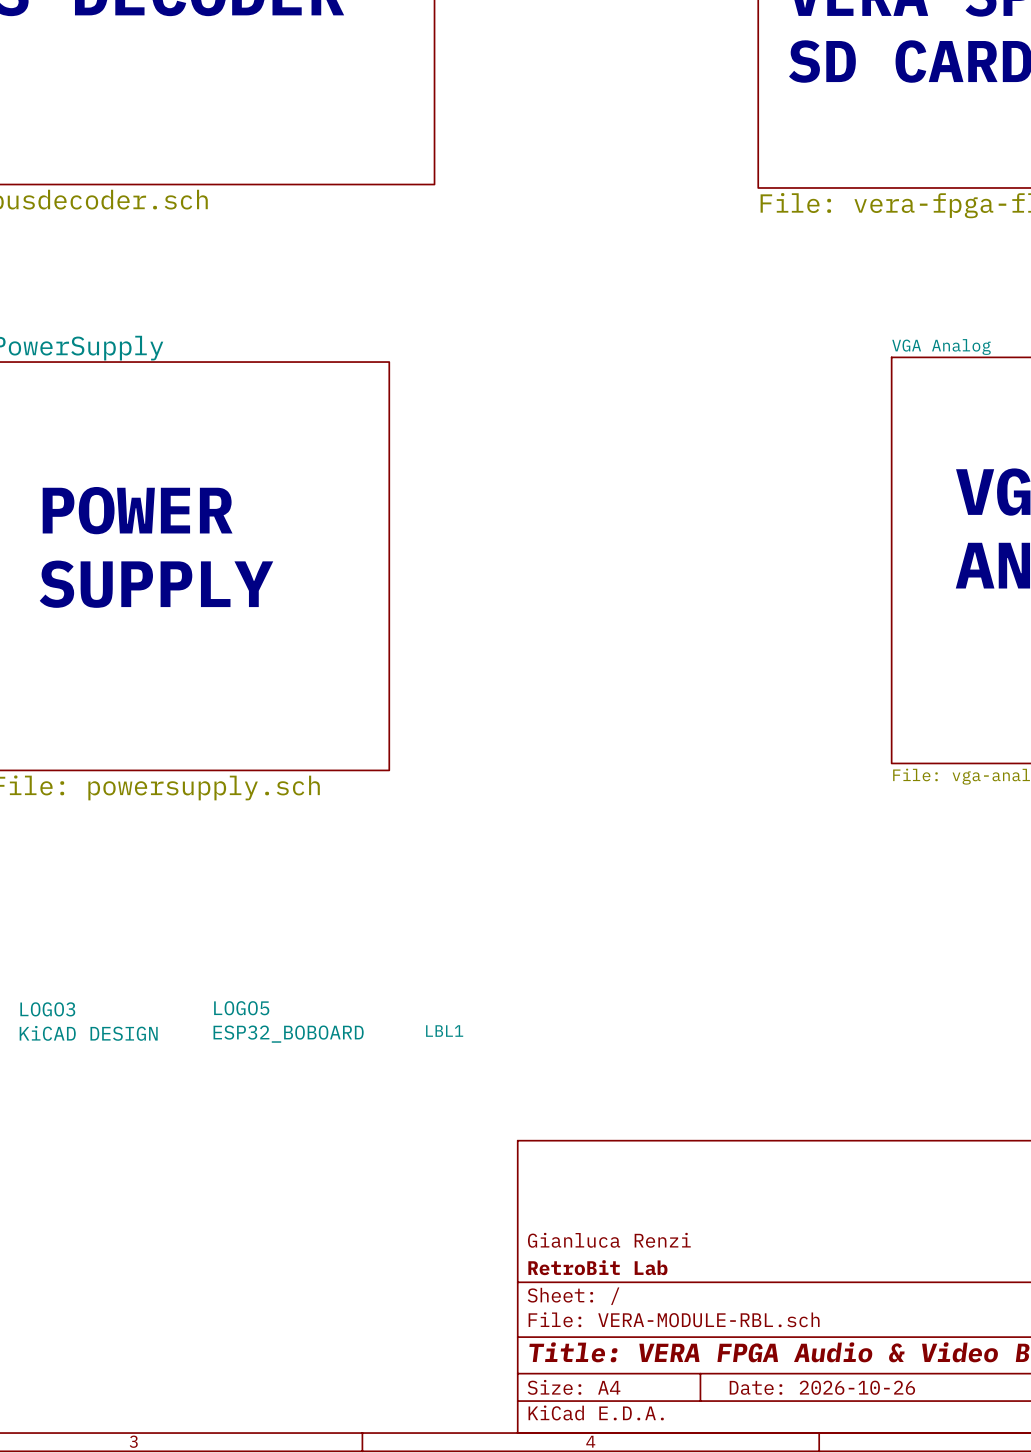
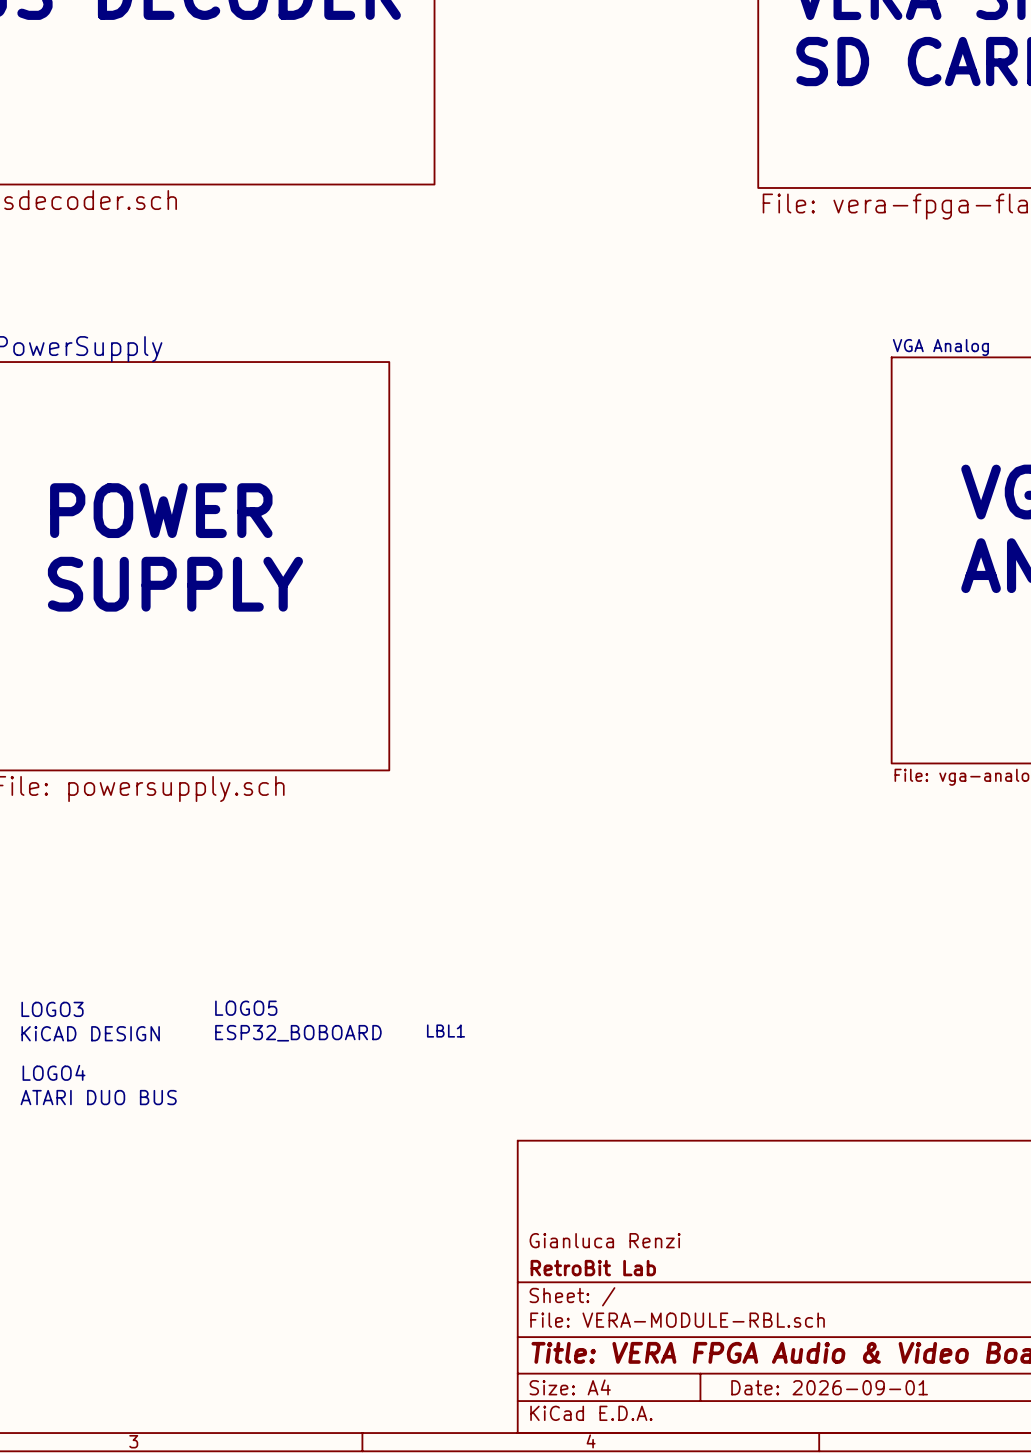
LOGO4: none -> ATARI DUO BUS (98, 1085)
title block: Date: 2026-10-26 (822, 1387) -> Date: 2026-09-01 (829, 1387)

